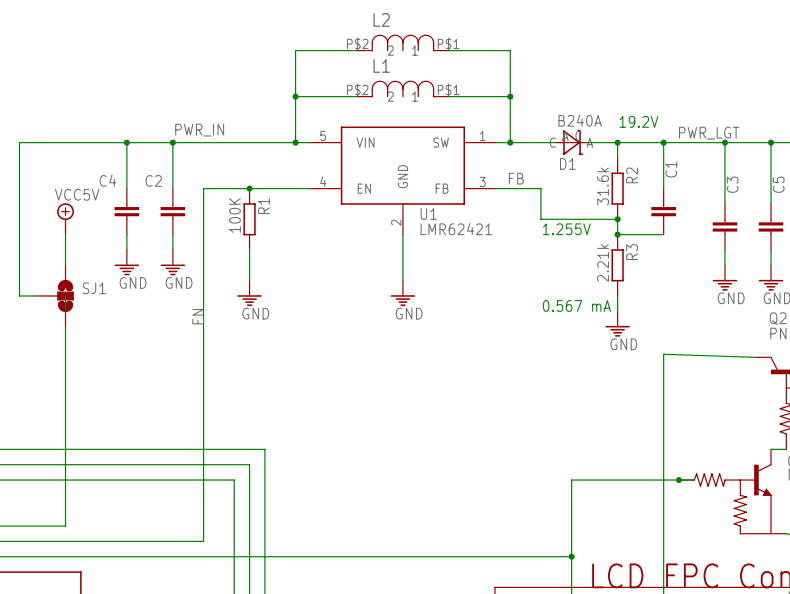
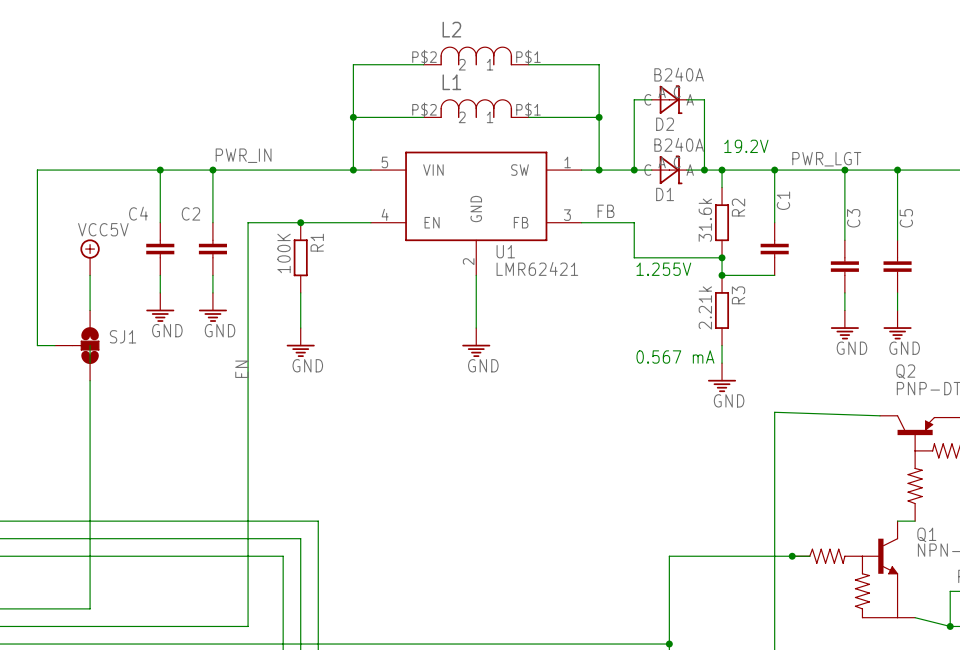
wire: none -> (651, 99) (634, 99) (634, 170)
D2: none -> B240A (669, 99)
wire: none -> (686, 99) (704, 99) (704, 170)
junction: none -> (634, 170)
junction: none -> (704, 170)

